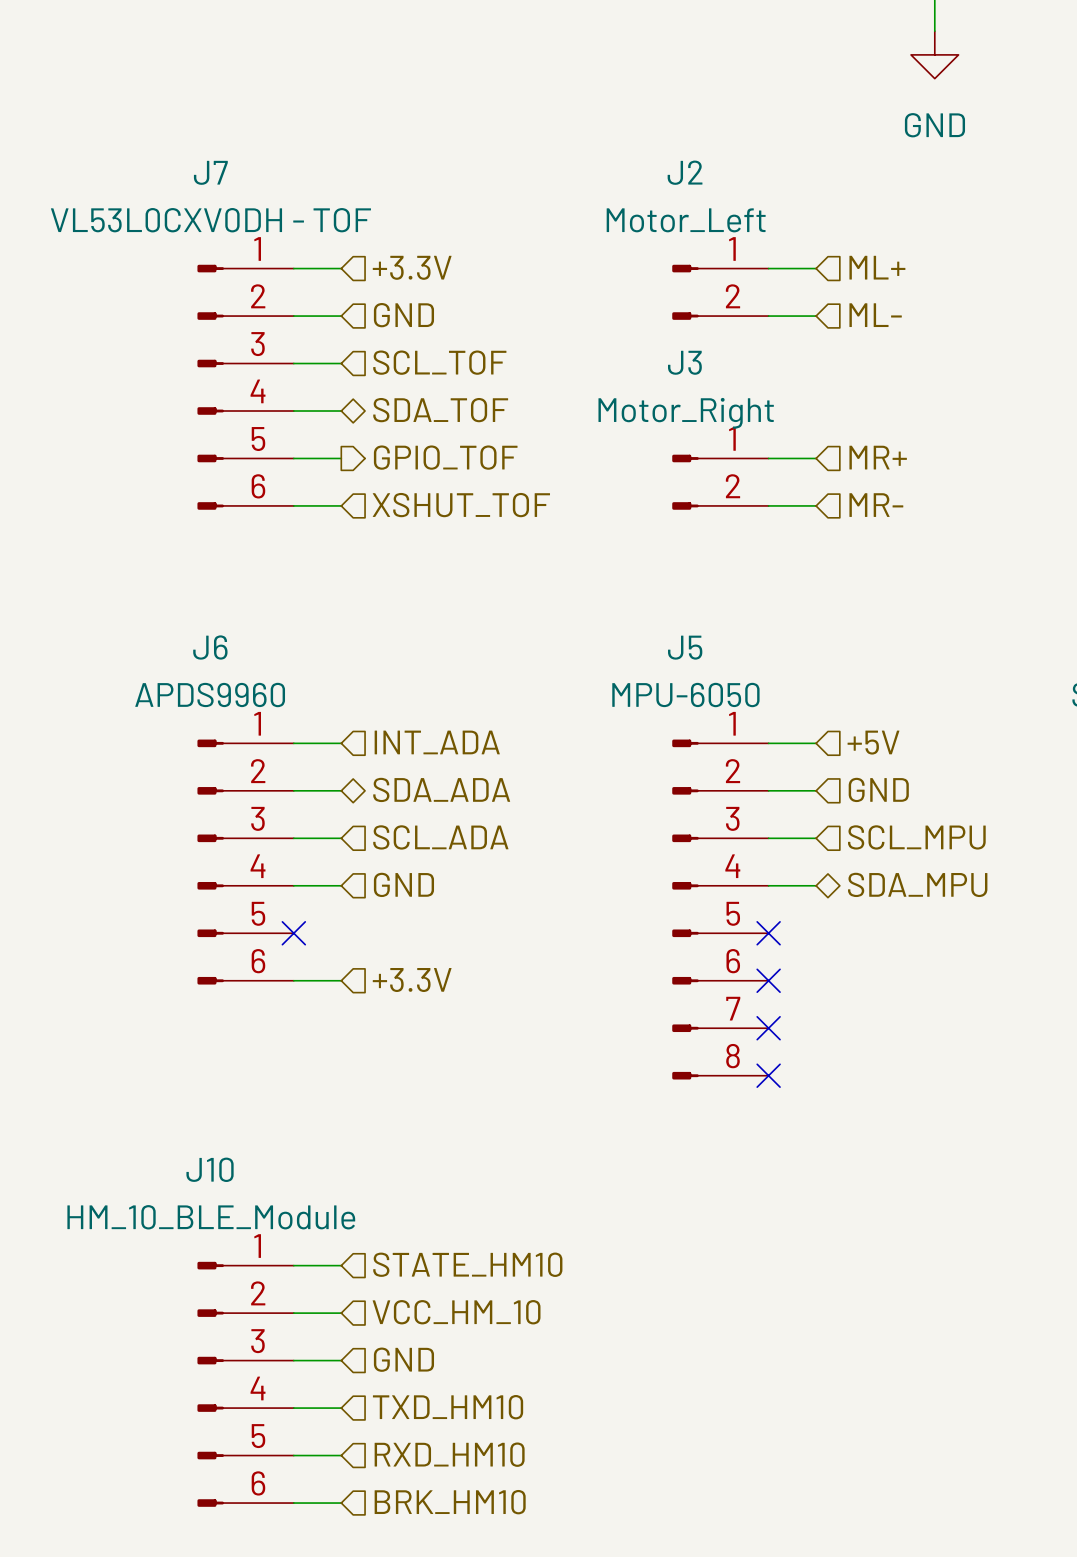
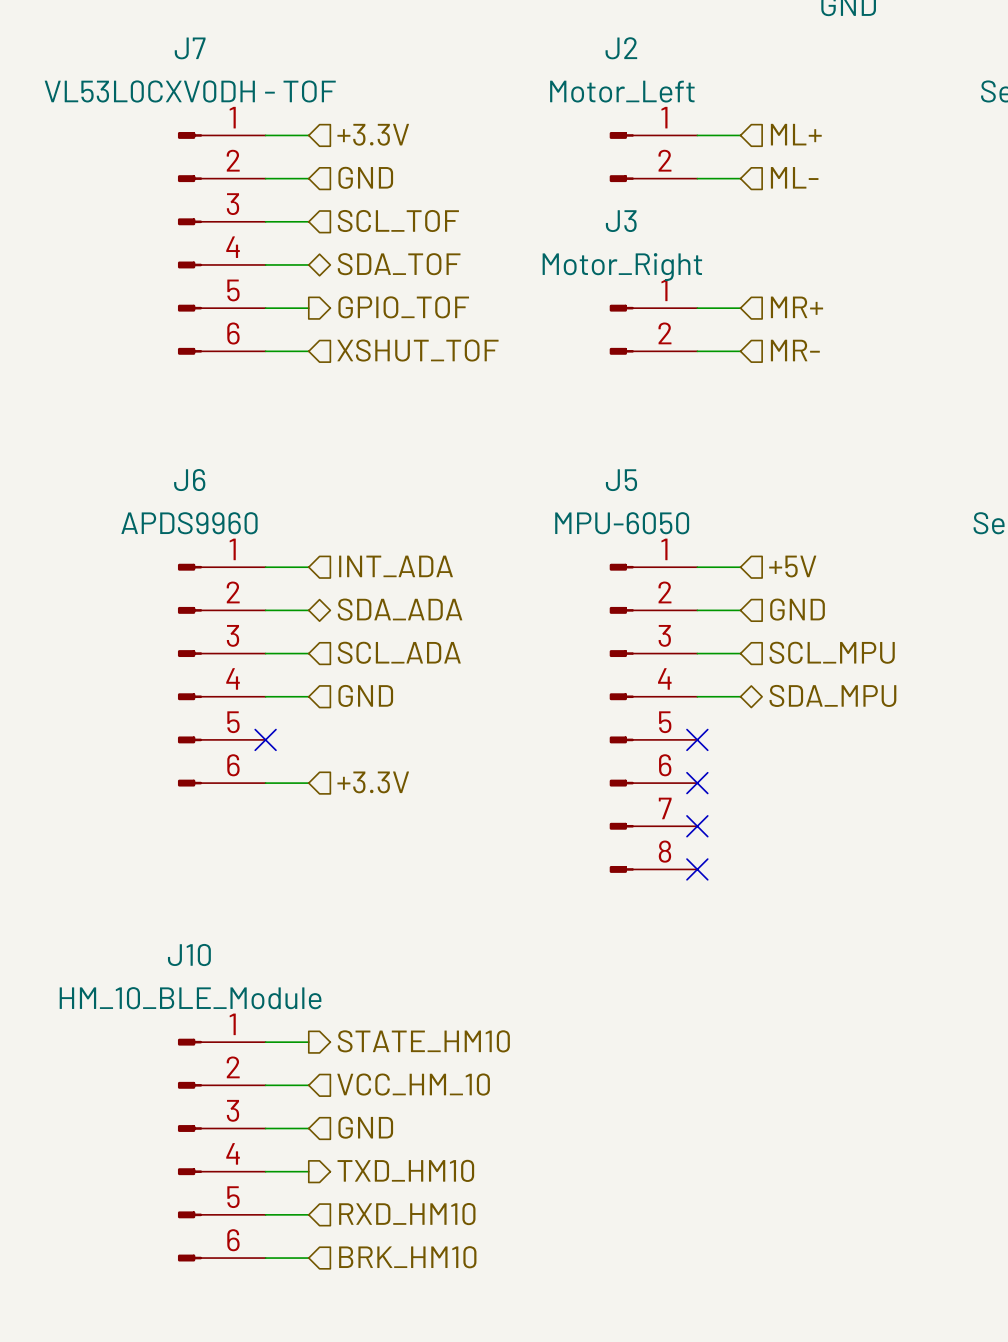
hierarchical label shape: input (467, 1264) -> output (423, 1041)
hierarchical label shape: input (448, 1407) -> output (405, 1170)

